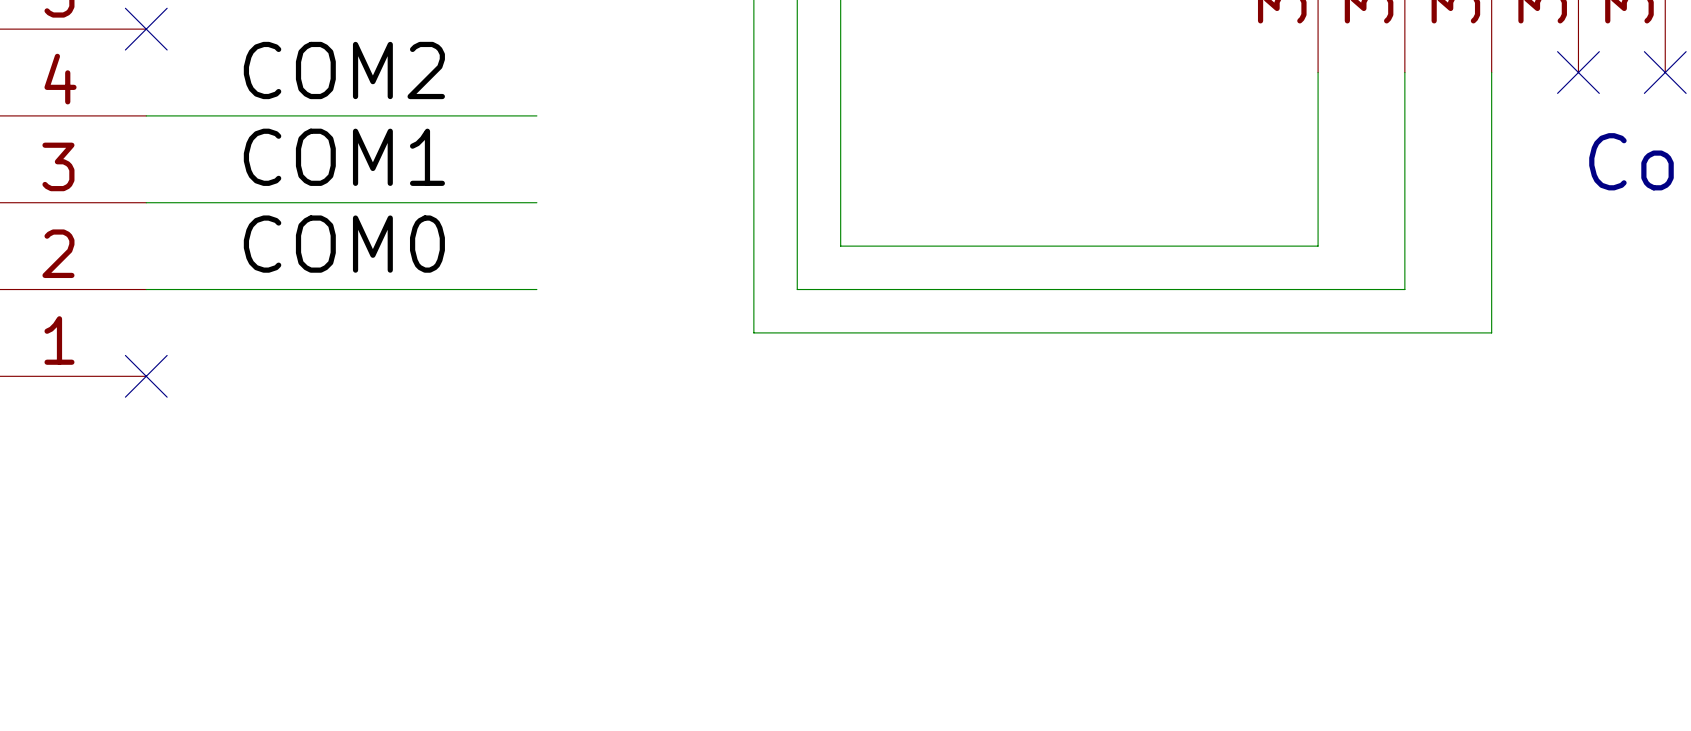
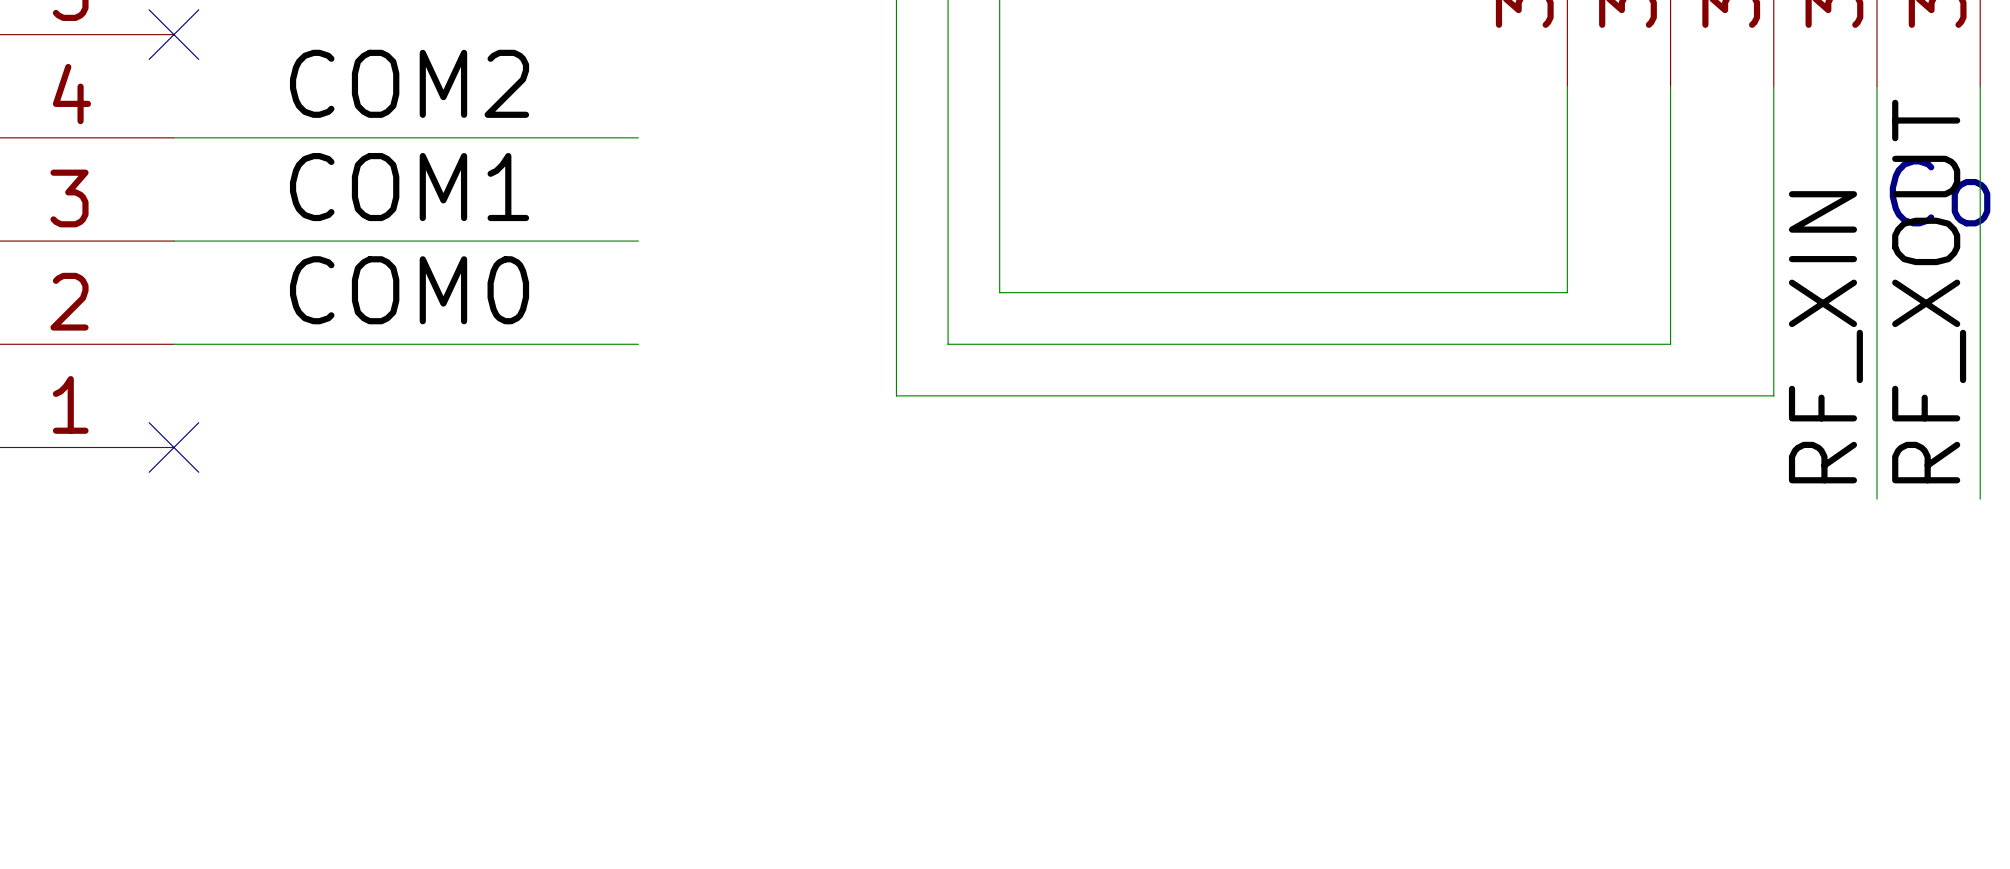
wire: none -> (1876, 86) (1876, 499)
no-connect mark: (1578, 72) -> none
wire: none -> (1980, 86) (1980, 499)
no-connect mark: (1665, 72) -> none
label: none -> RF_XOUT (1929, 291)
label: none -> RF_XIN (1825, 337)

